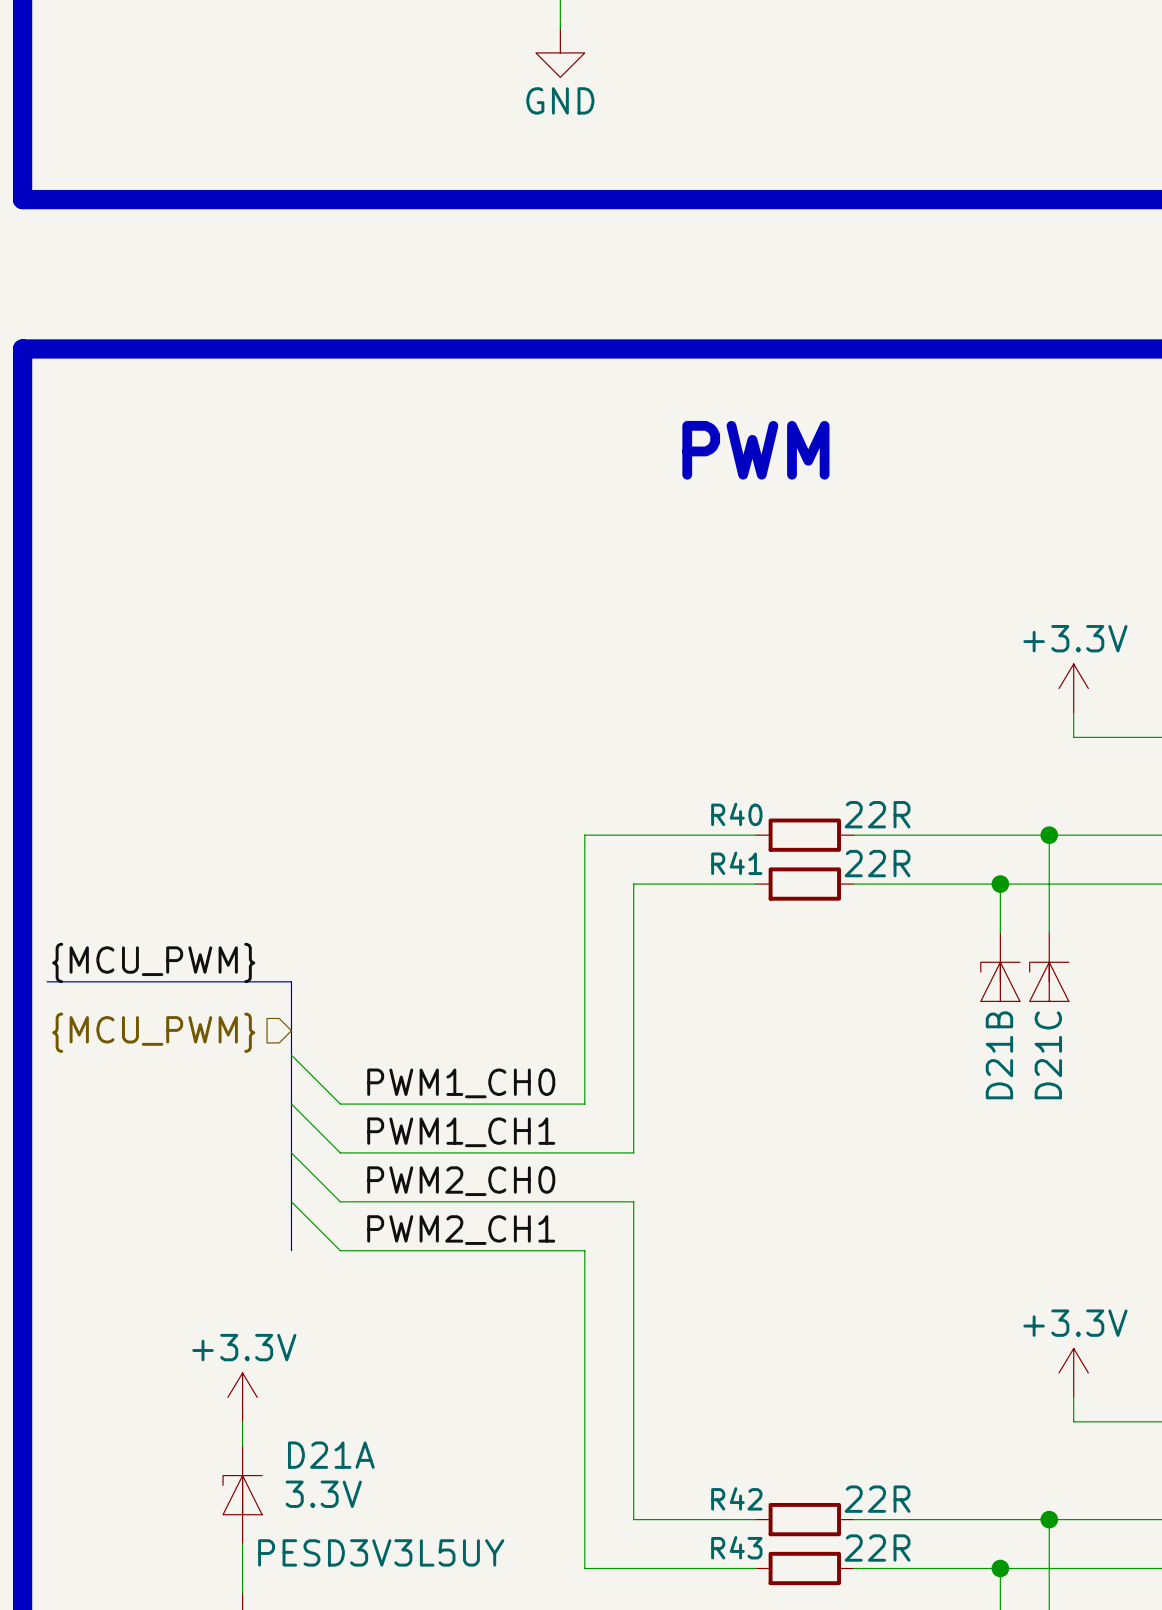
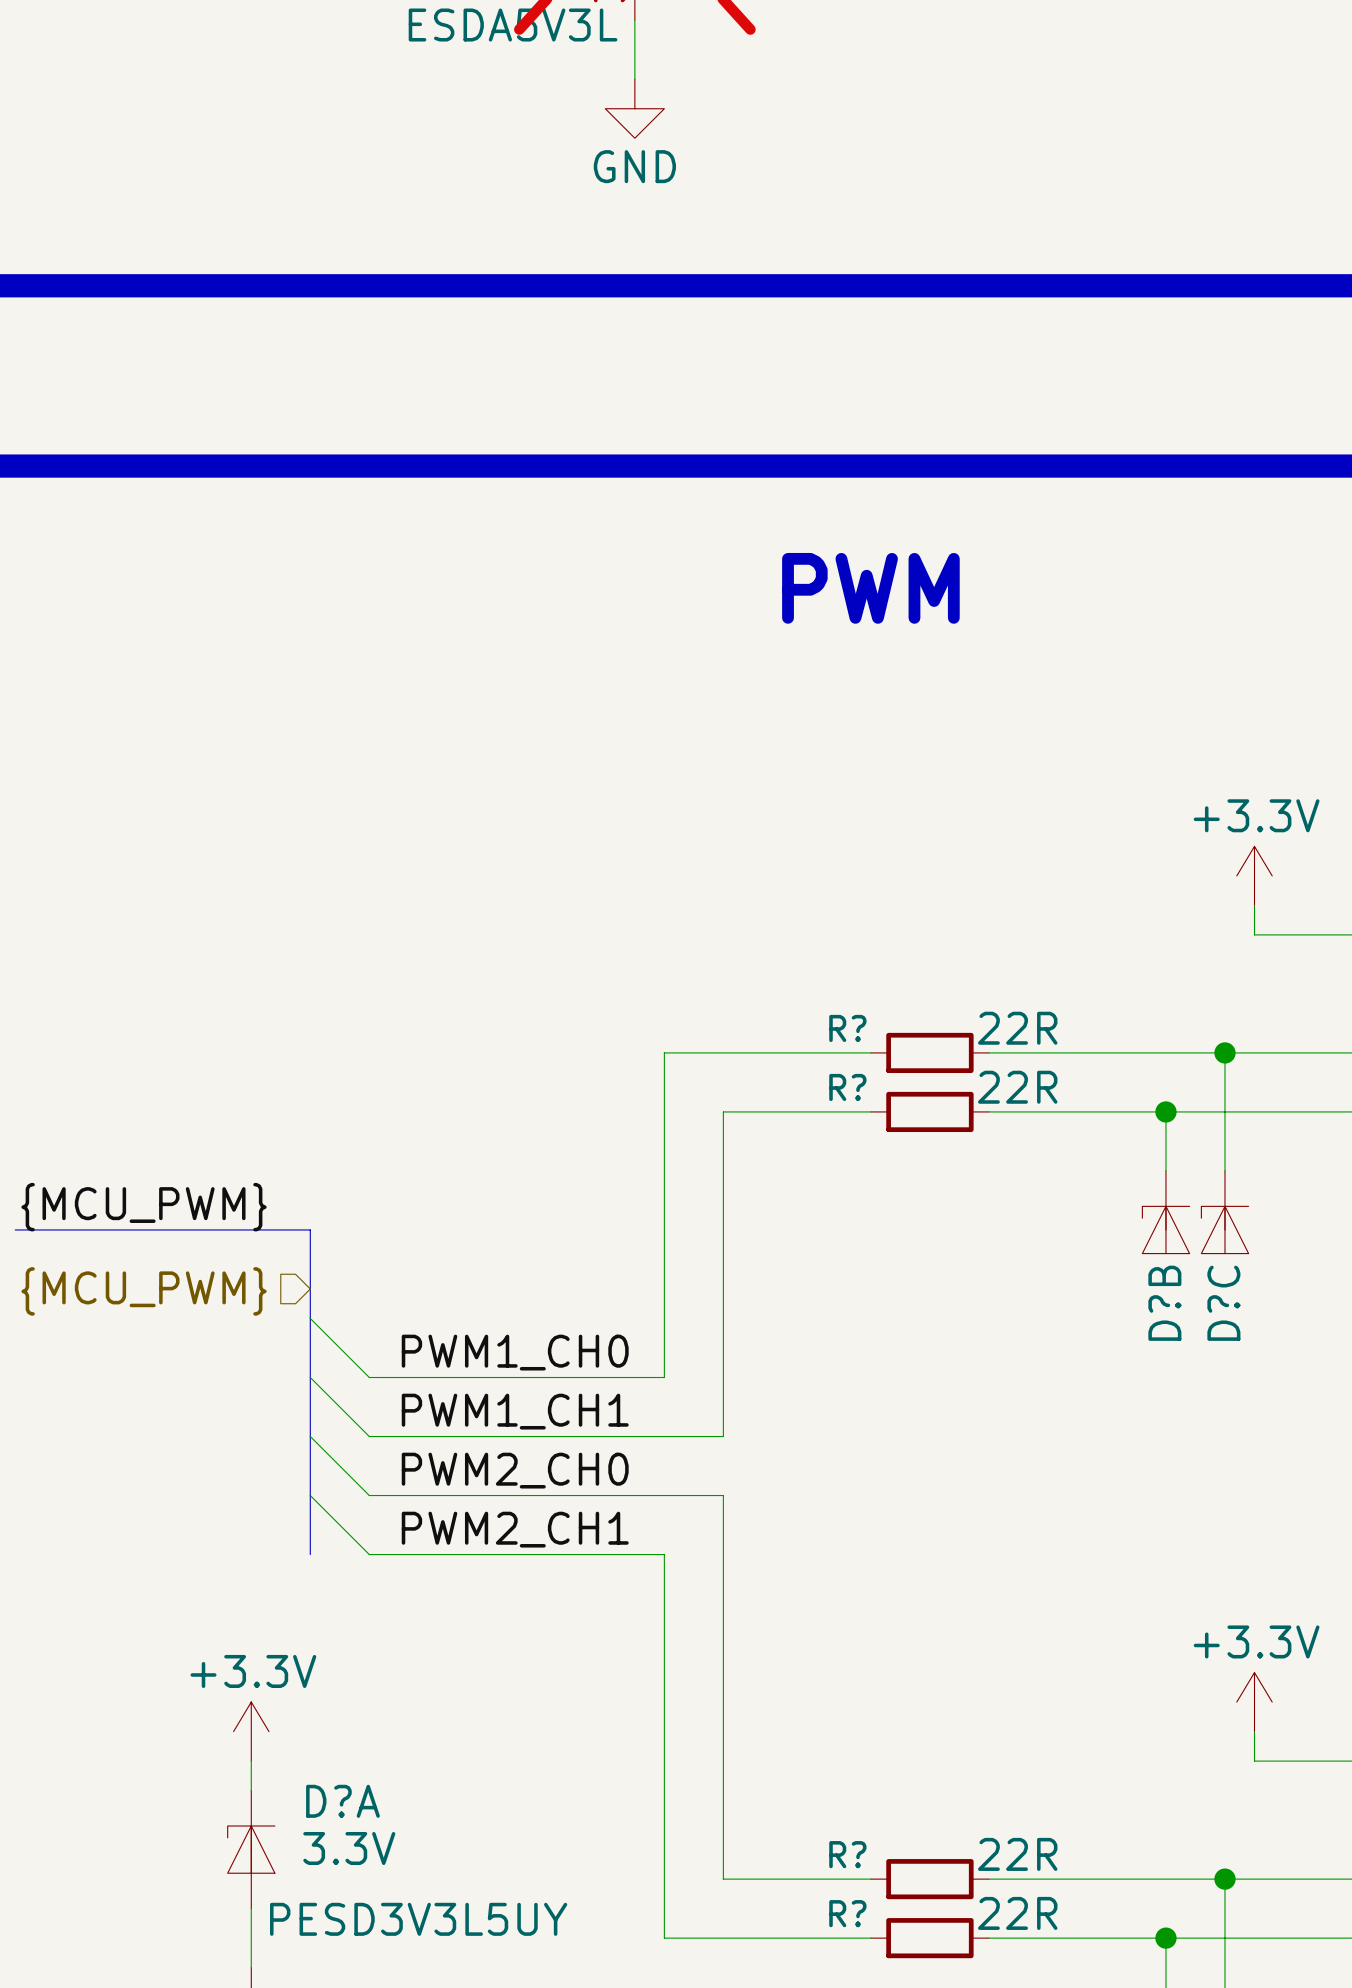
R40 name: R40 (736, 814) -> R? (847, 1028)
R41 name: R41 (736, 863) -> R? (847, 1087)
D21B name: D21B (999, 1055) -> D?B (1164, 1303)
D21C name: D21C (1048, 1055) -> D?C (1223, 1303)
D21A name: D21A (331, 1455) -> D?A (342, 1801)
R42 name: R42 (736, 1498) -> R? (847, 1854)
R43 name: R43 (736, 1547) -> R? (847, 1913)

